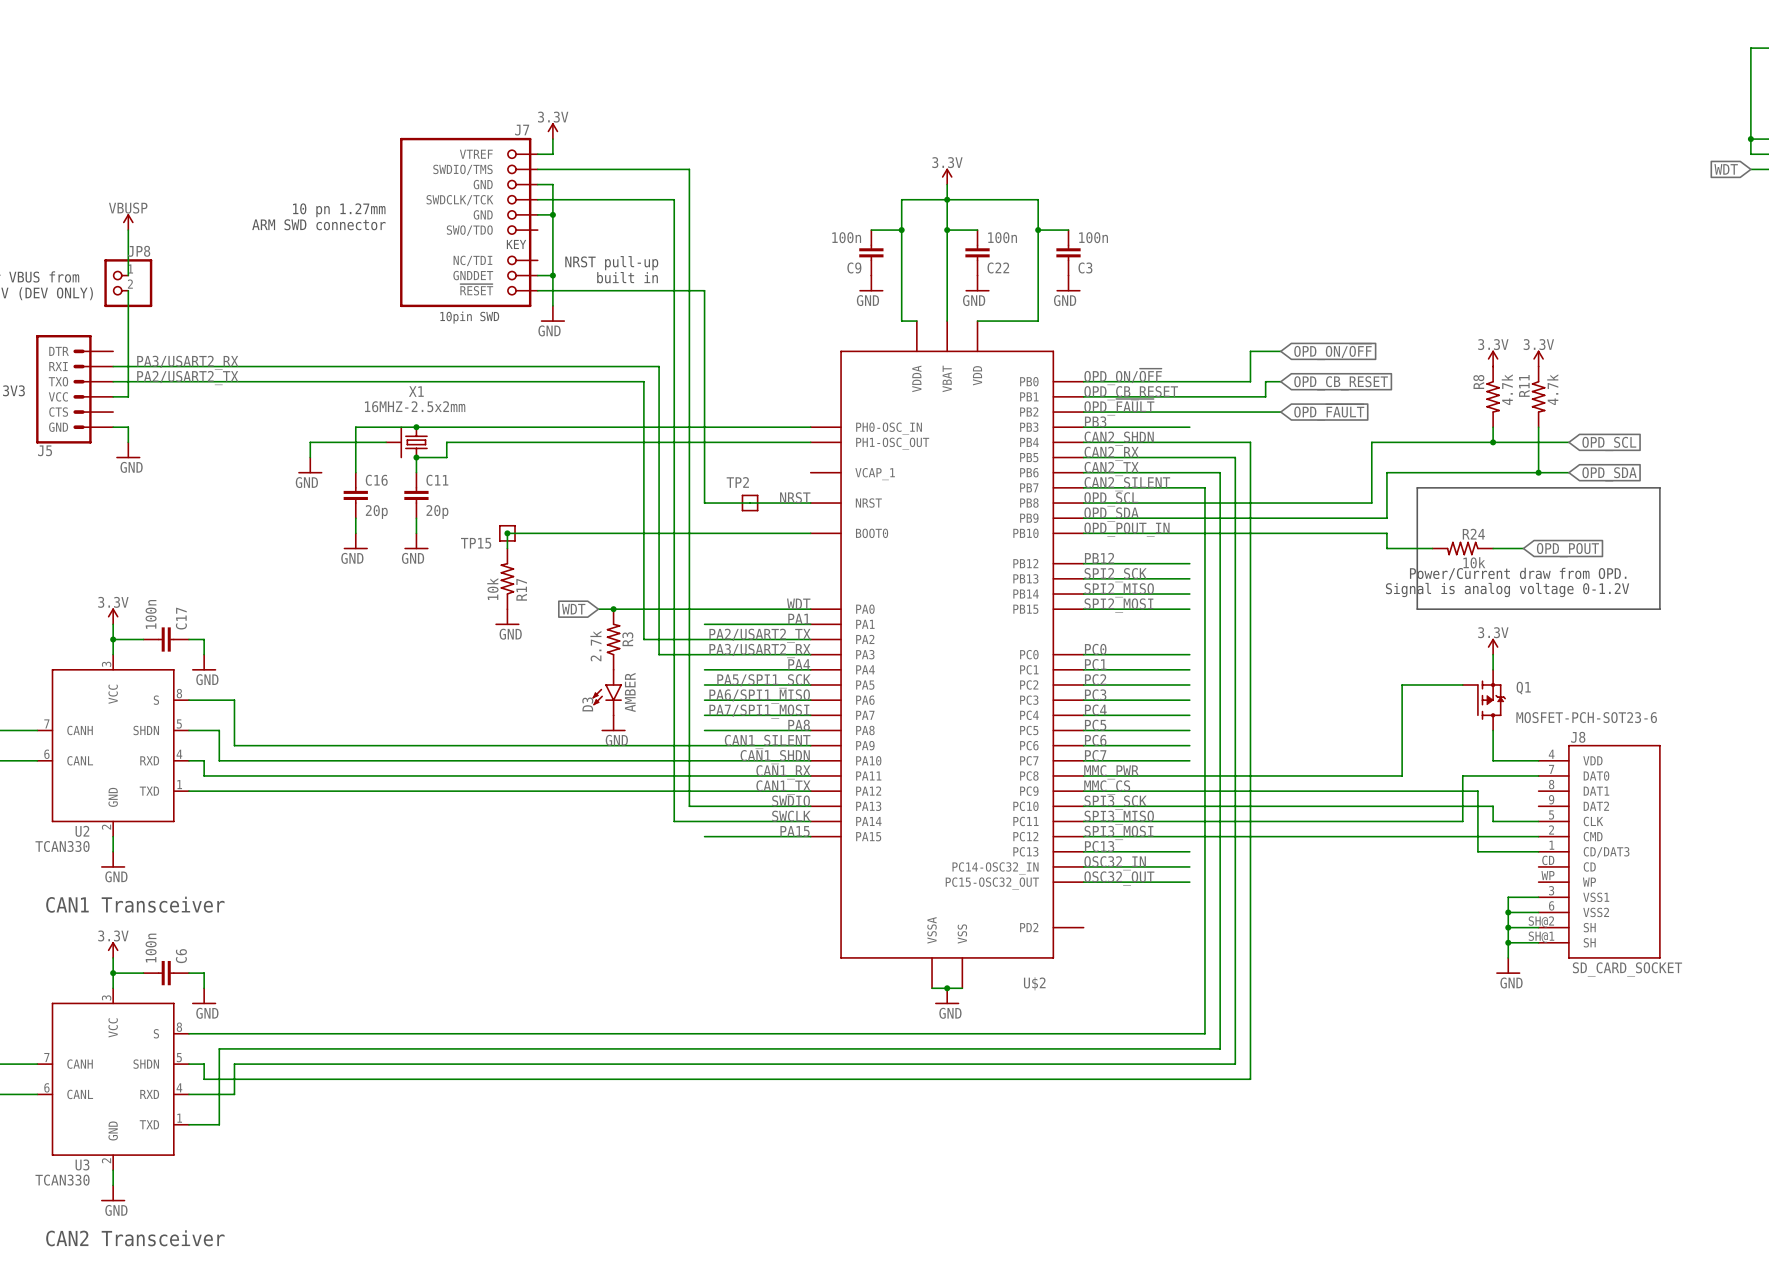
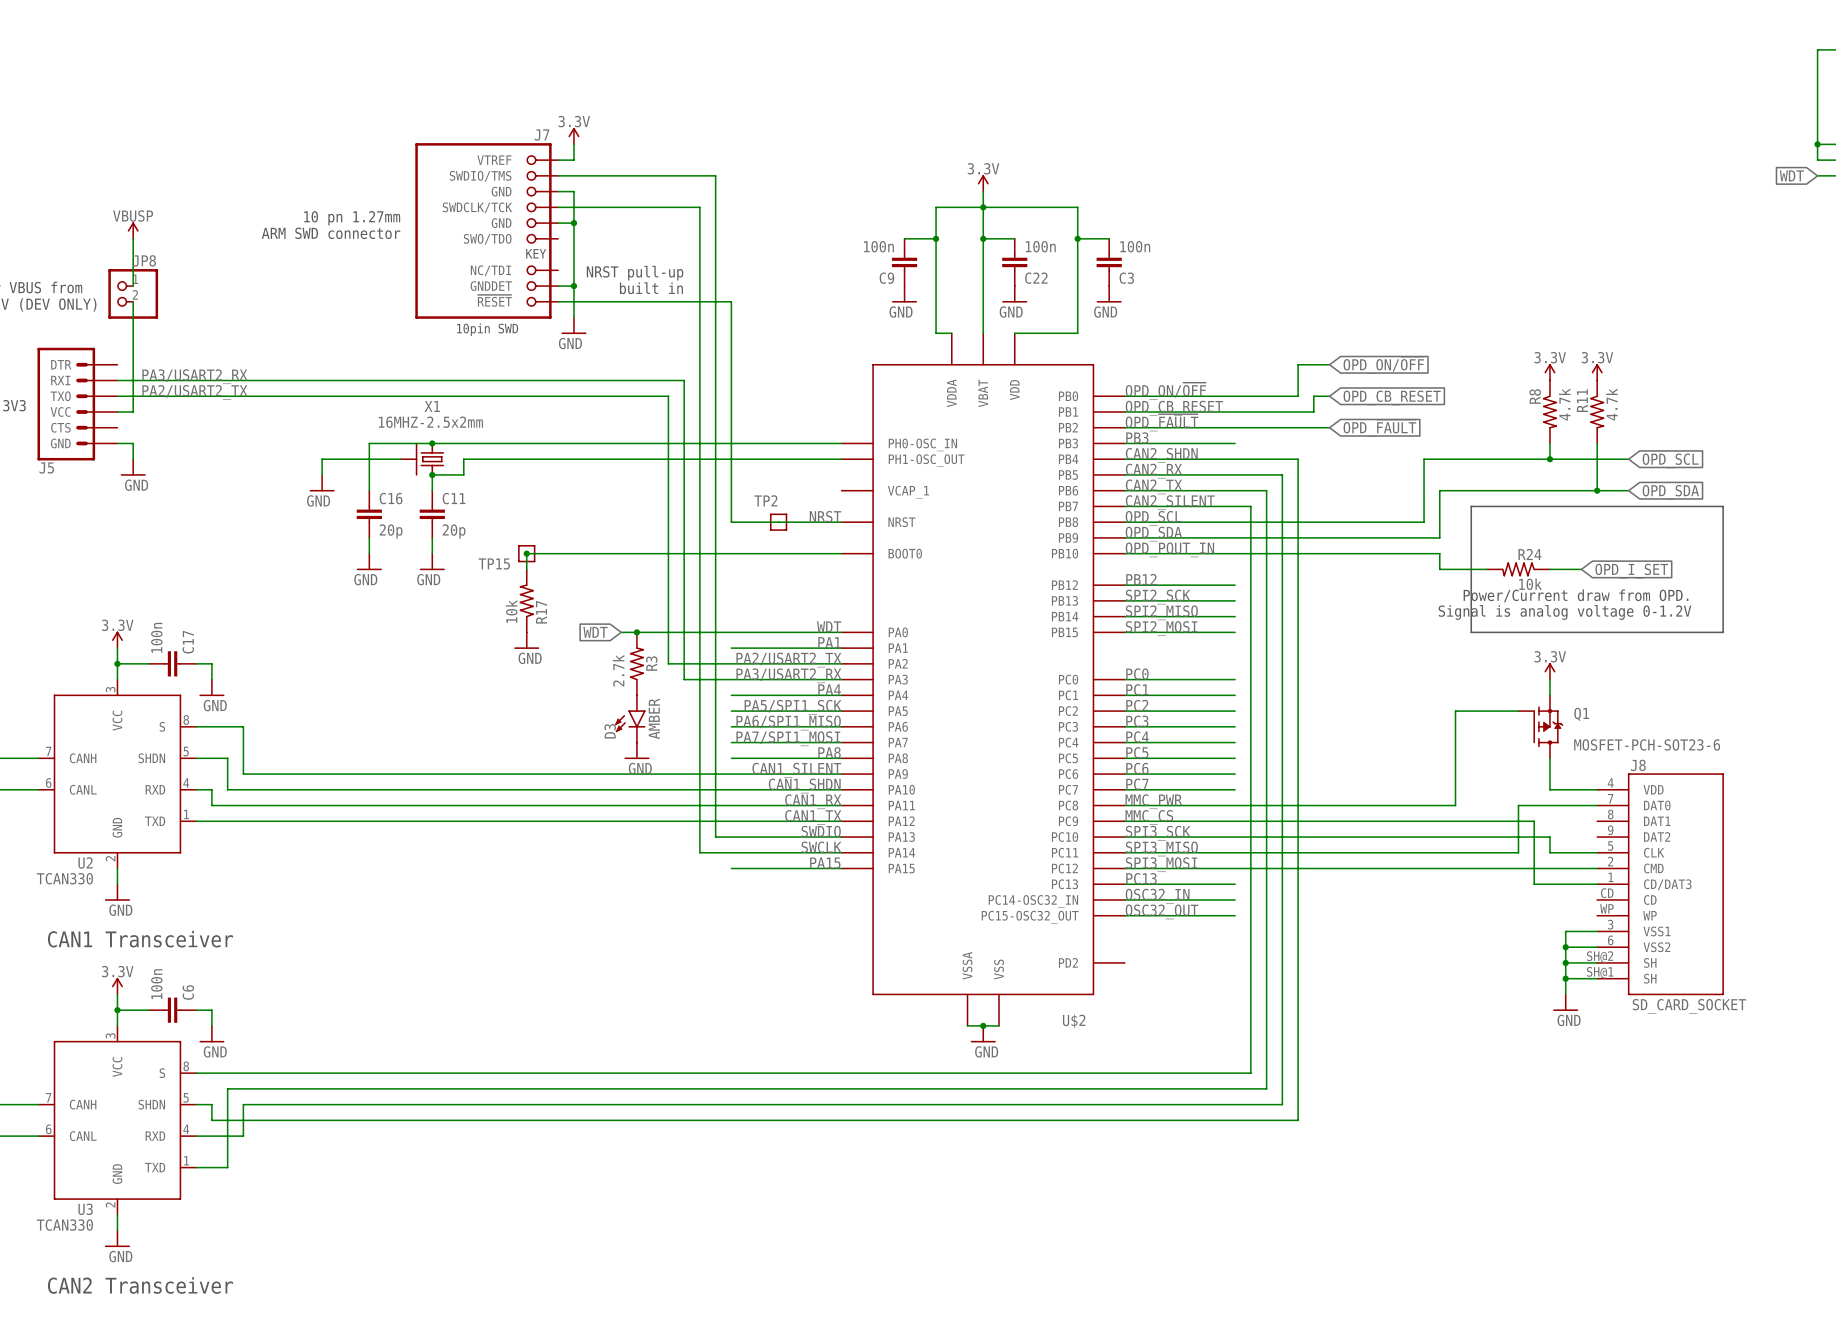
global label: OPD_POUT (1567, 550) -> OPD_I_SET (1631, 571)

